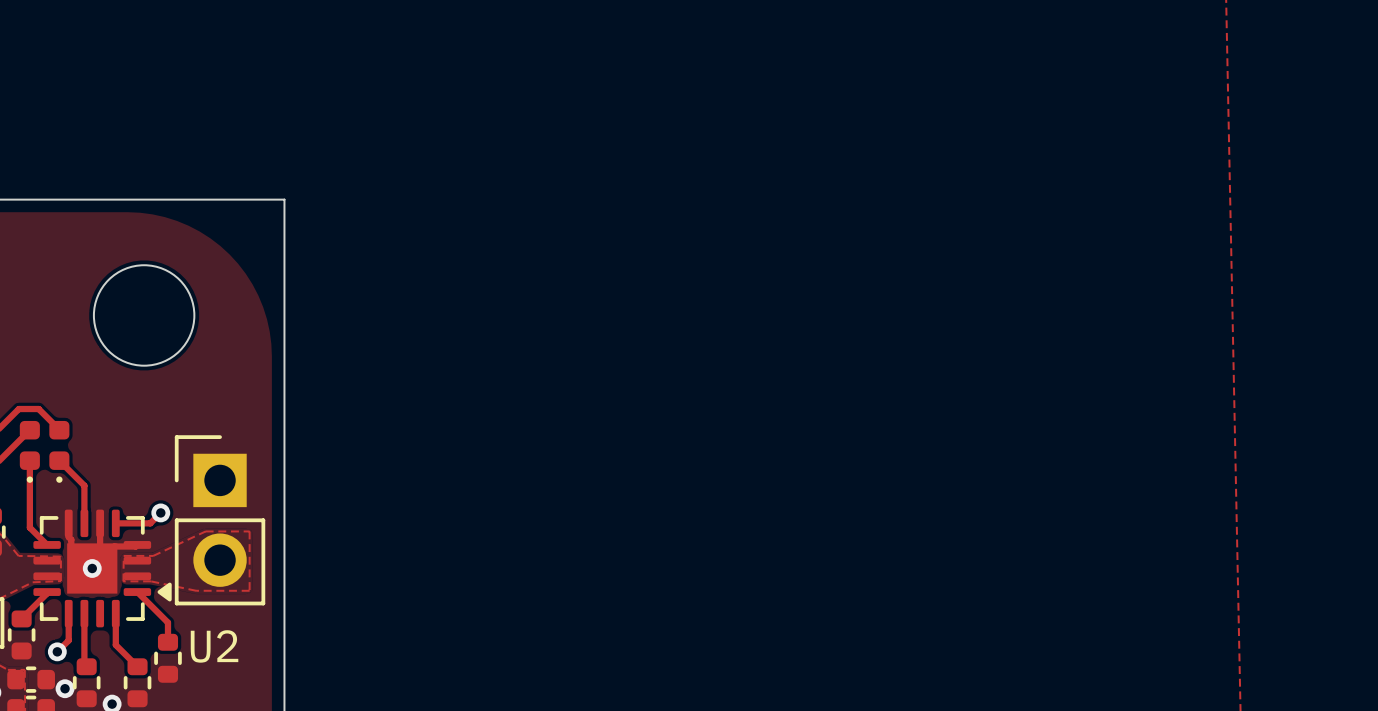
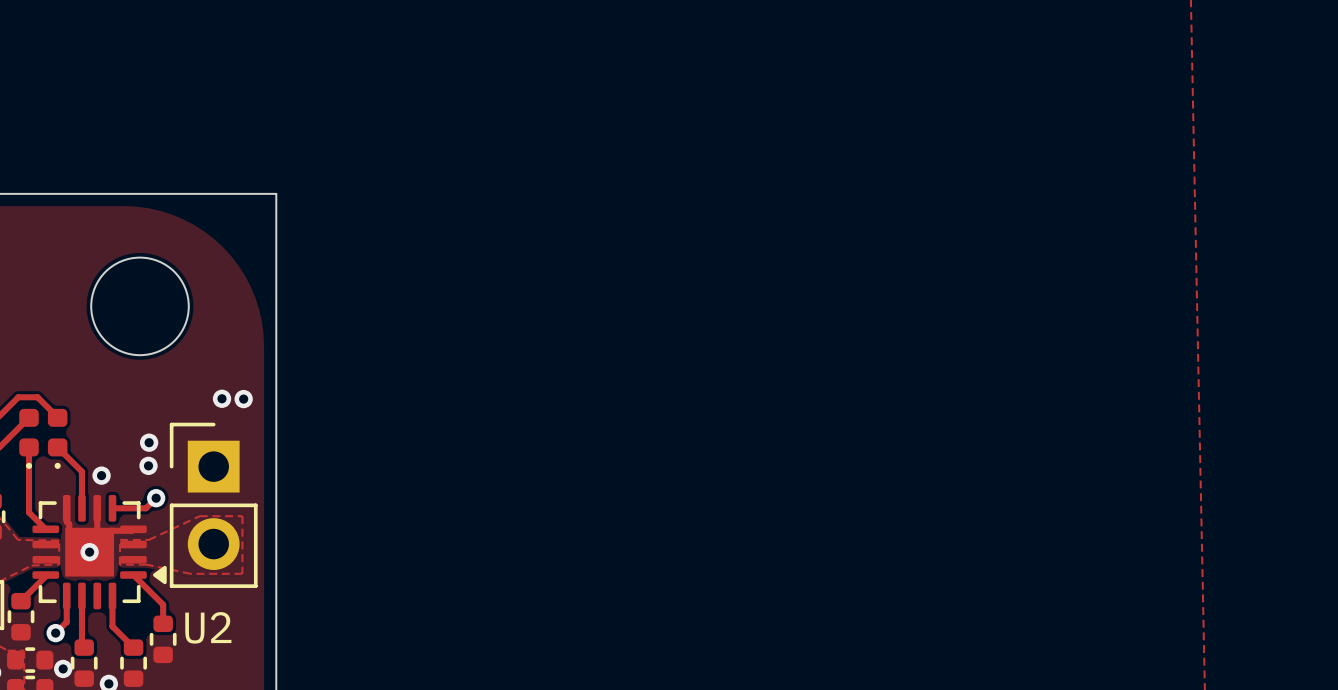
via: none -> (222, 398)
via: none -> (243, 399)
via: none -> (149, 442)
via: none -> (148, 465)
via: none -> (101, 475)

